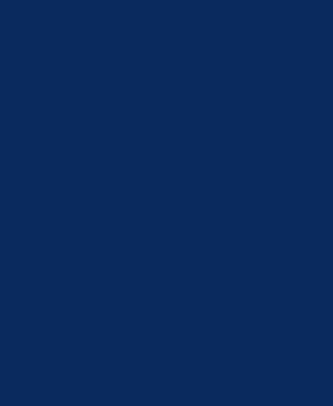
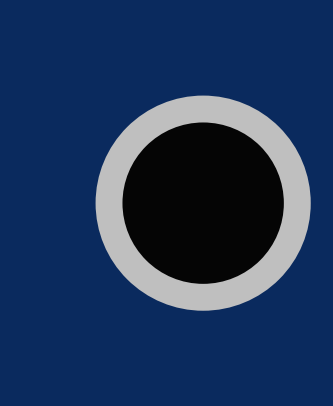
via: none -> (203, 203)

